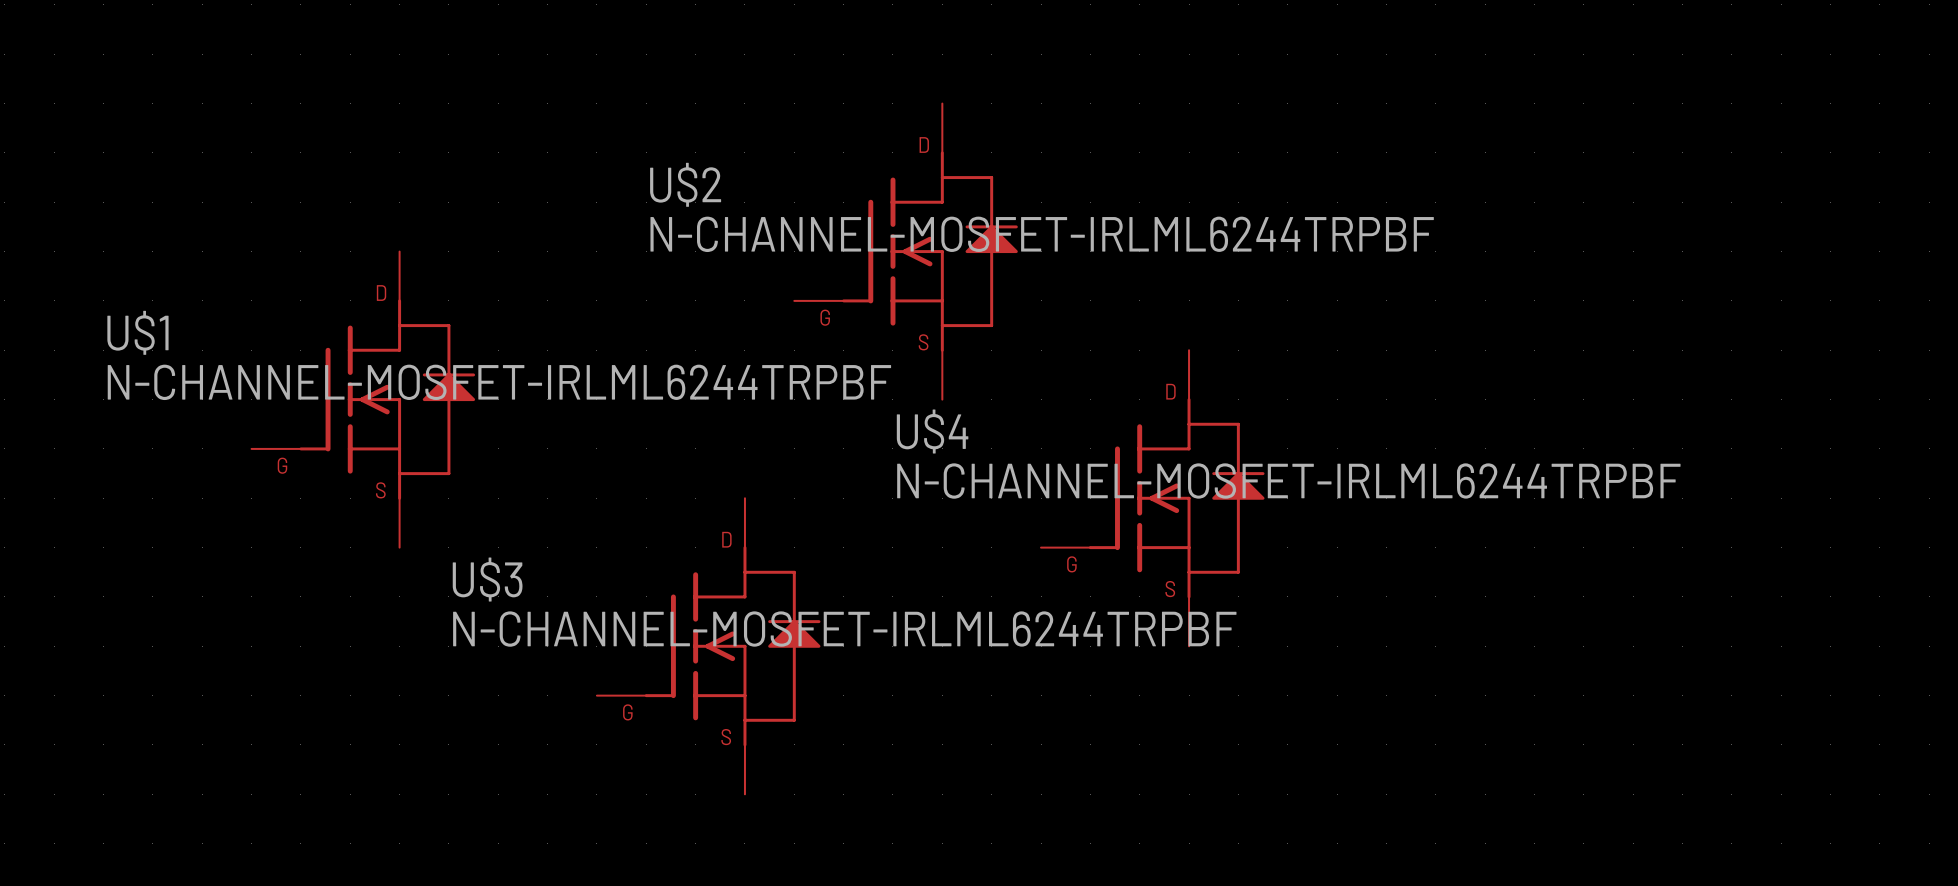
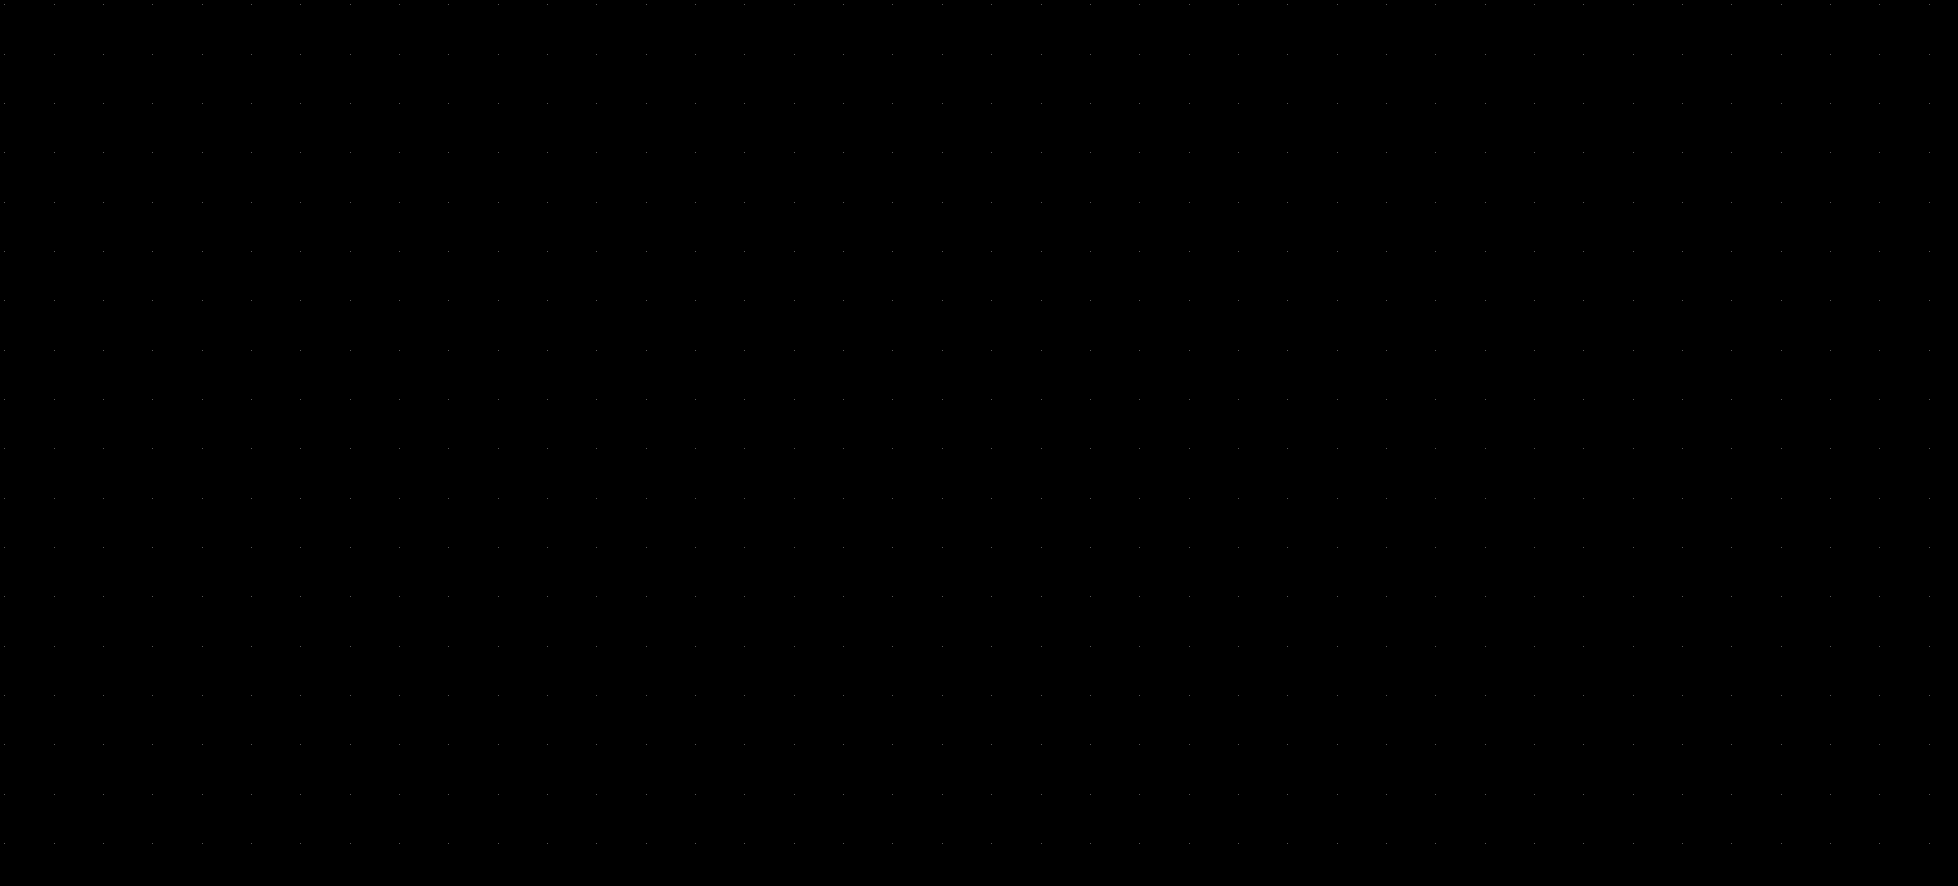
U$2: N-CHANNEL-MOSFET-IRLML6244TRPBF (906, 251) -> none
U$1: N-CHANNEL-MOSFET-IRLML6244TRPBF (363, 399) -> none
U$4: N-CHANNEL-MOSFET-IRLML6244TRPBF (1152, 498) -> none
U$3: N-CHANNEL-MOSFET-IRLML6244TRPBF (708, 646) -> none

